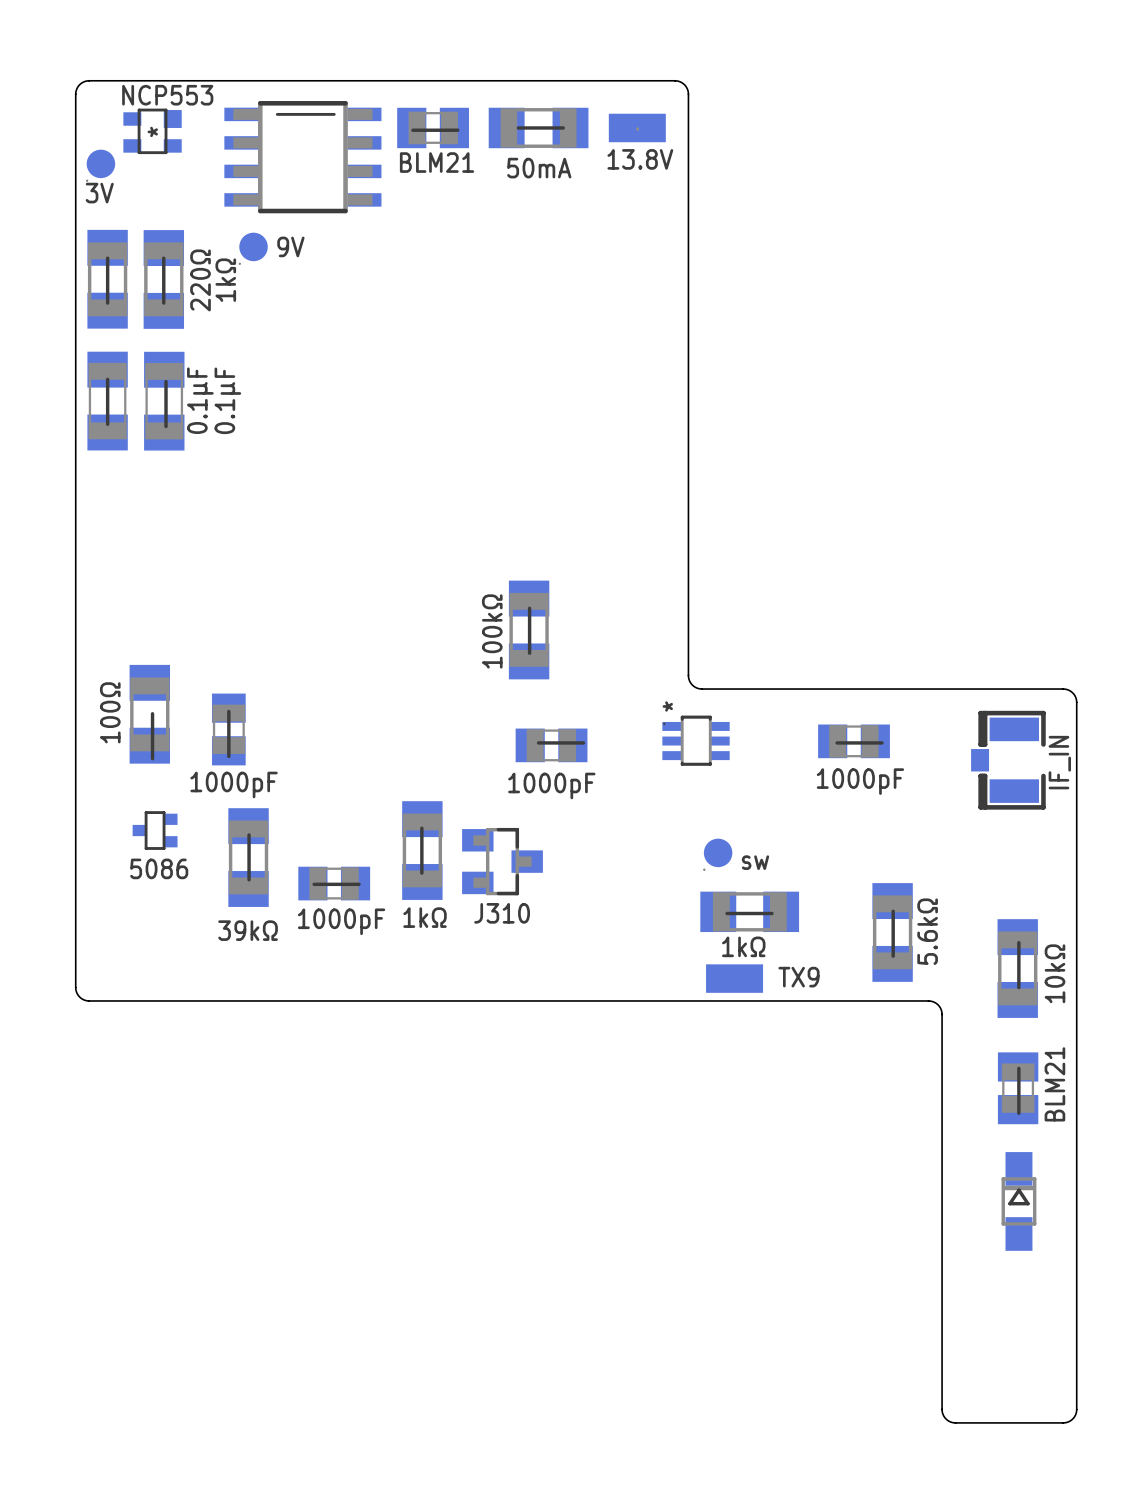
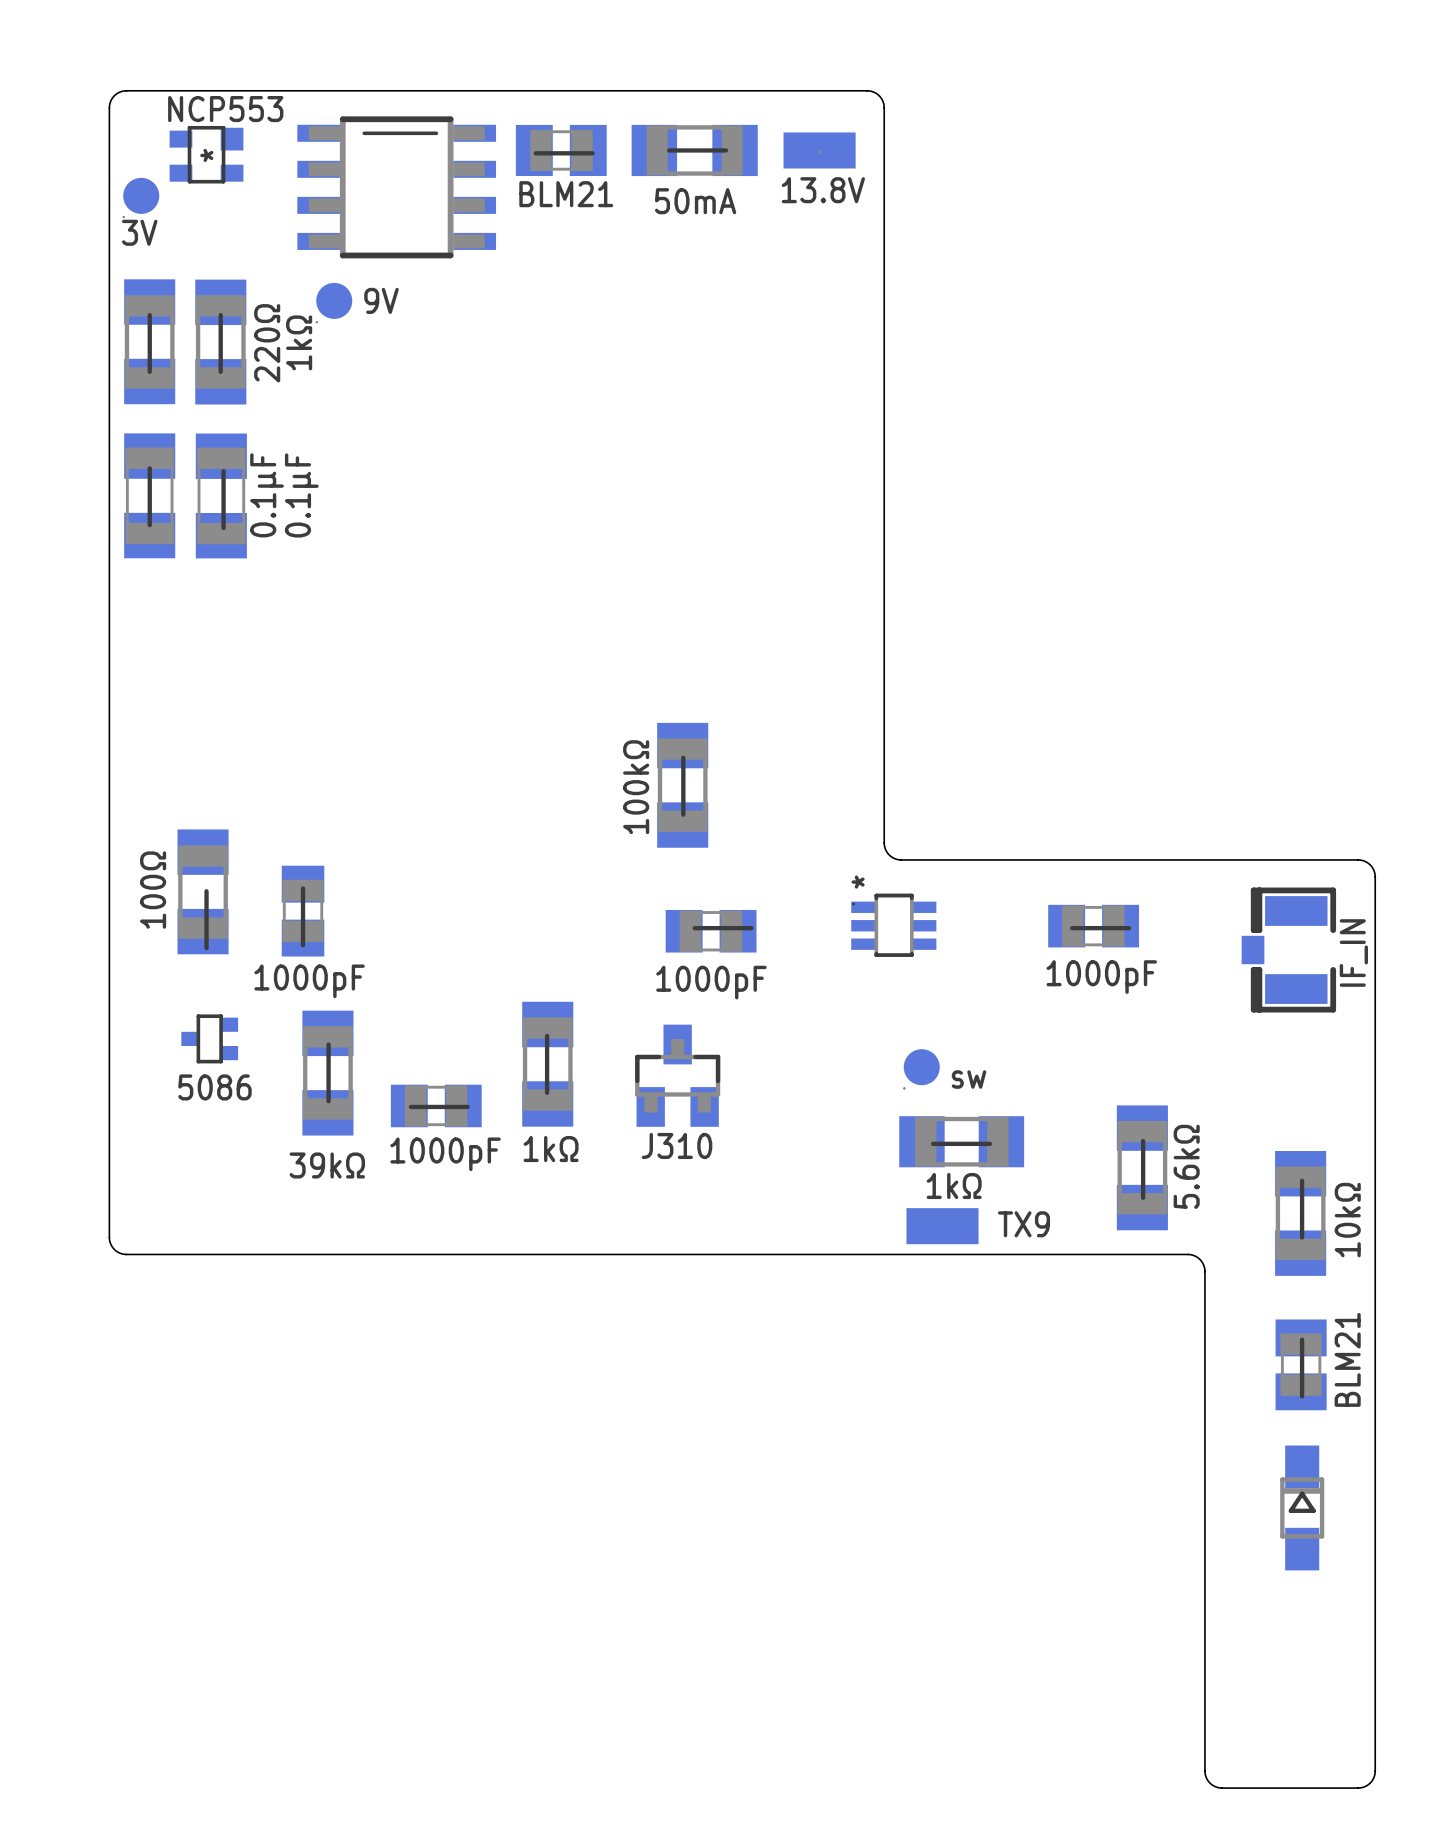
part rotation: 0° (502, 861) -> 90° counterclockwise (677, 1075)

